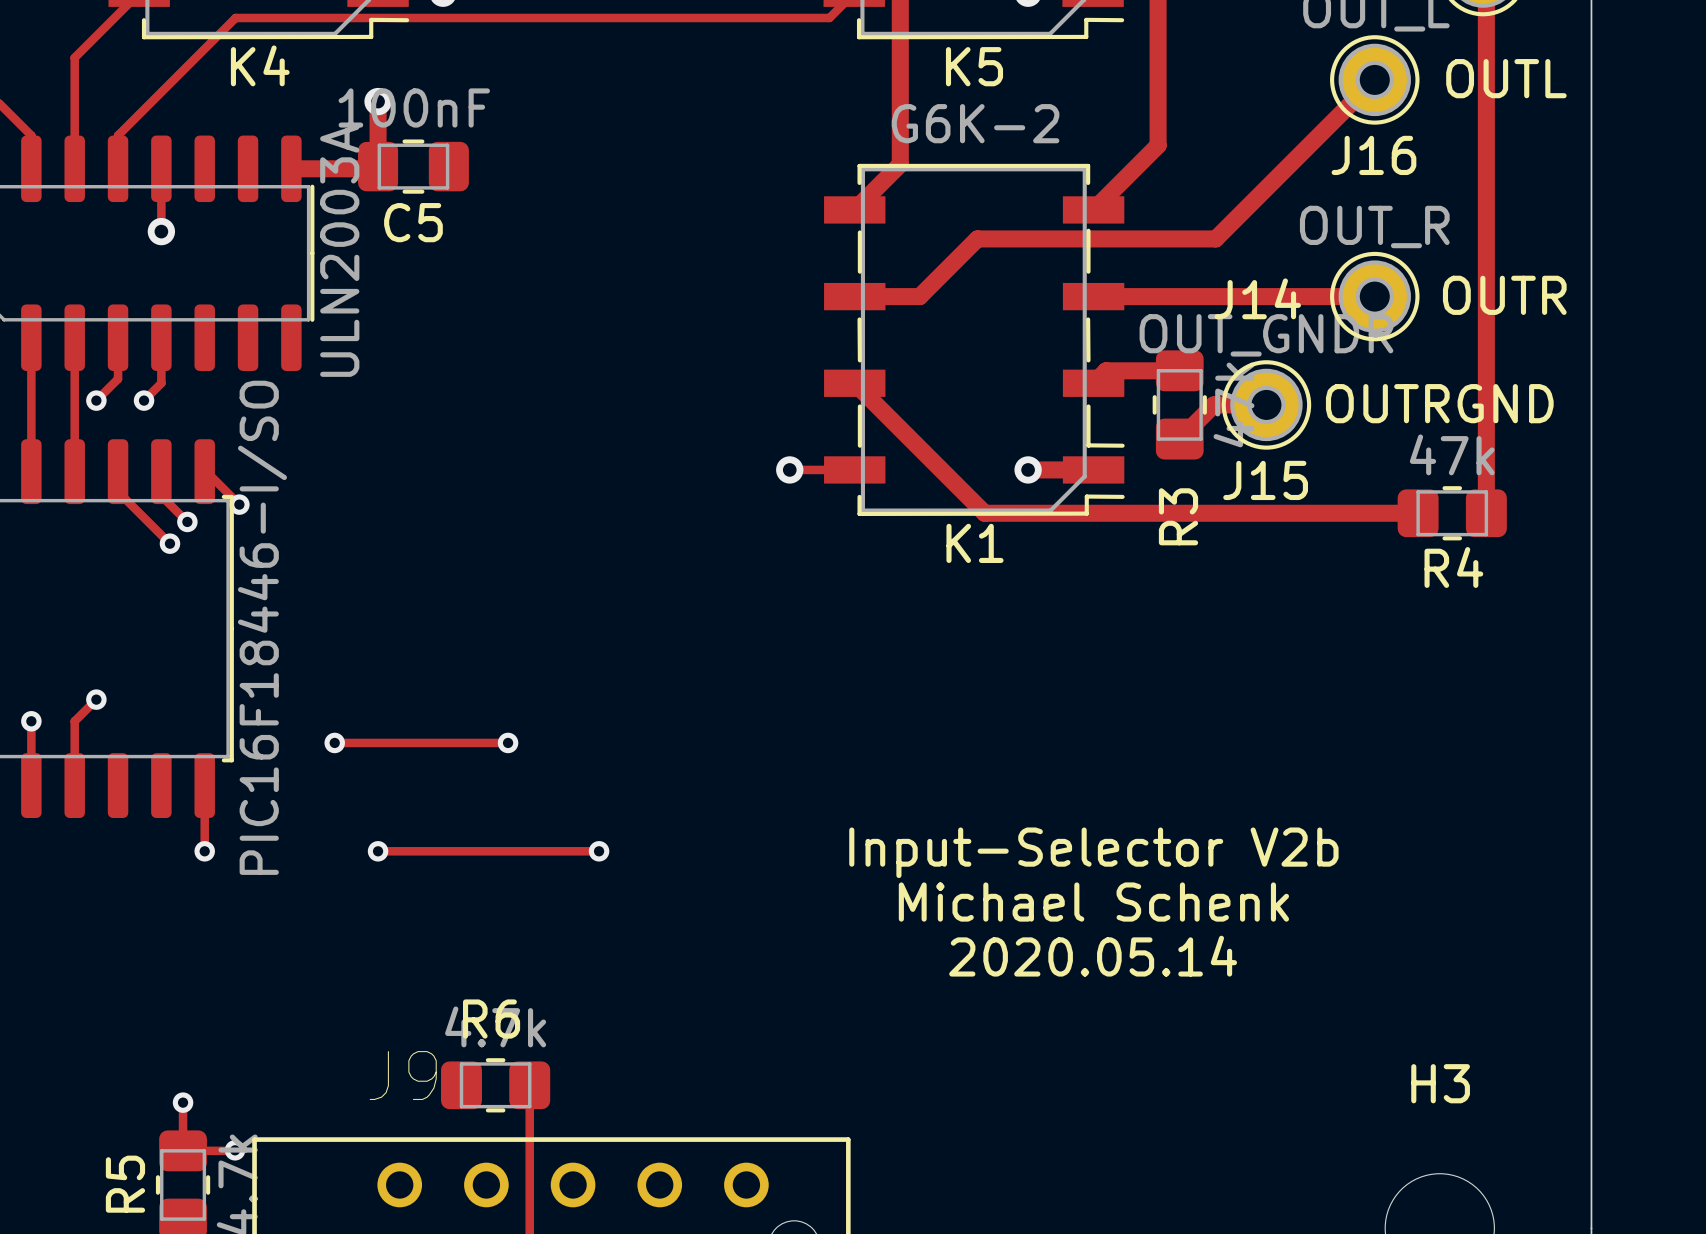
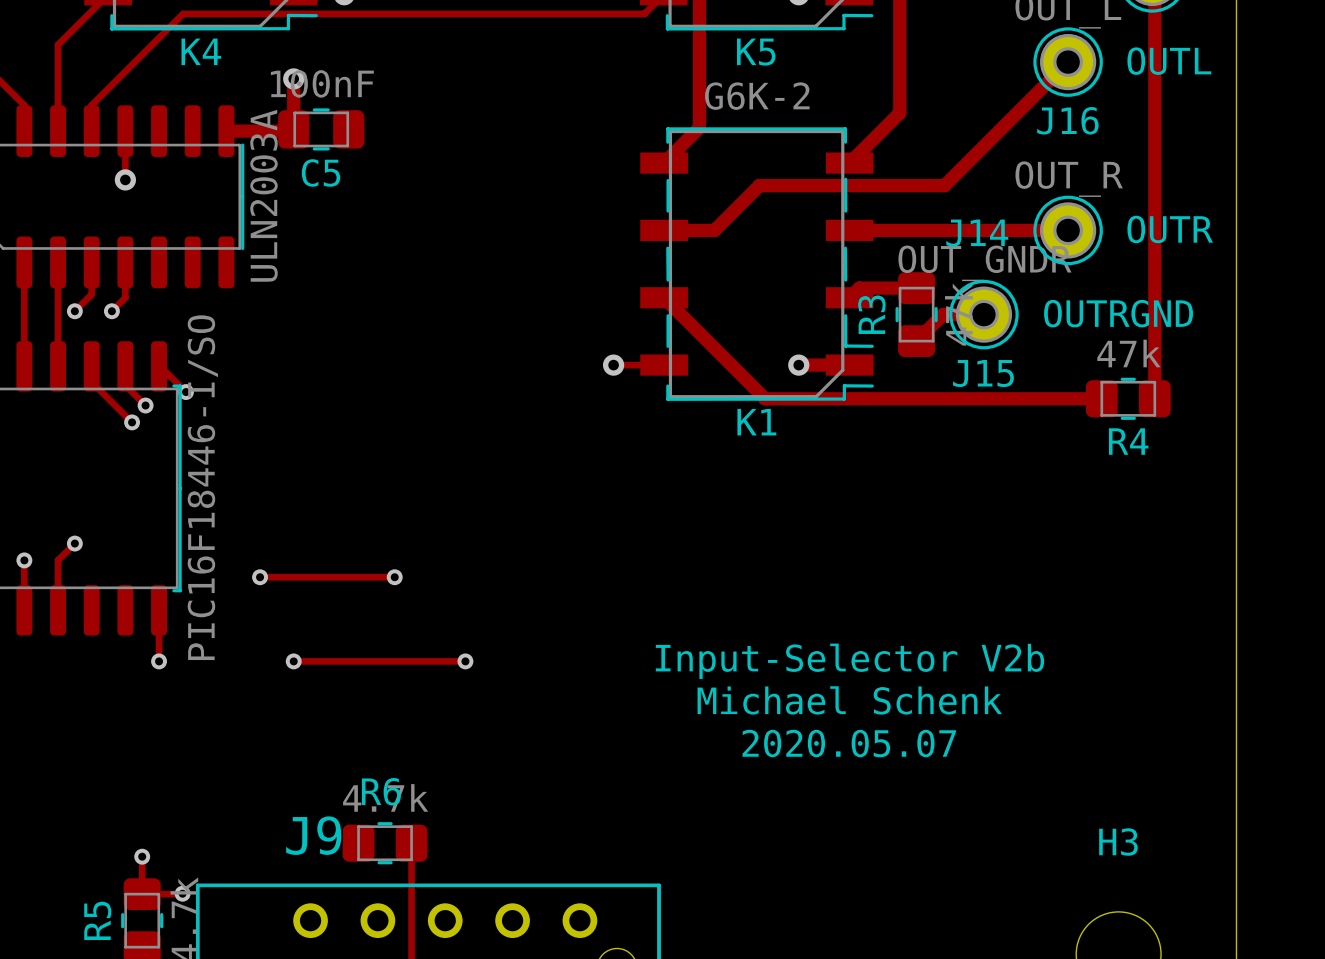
R3 name position: R3 (1178, 516) -> R3 (871, 314)
text: 2020.05.14 (1093, 956) -> 2020.05.07 (849, 743)

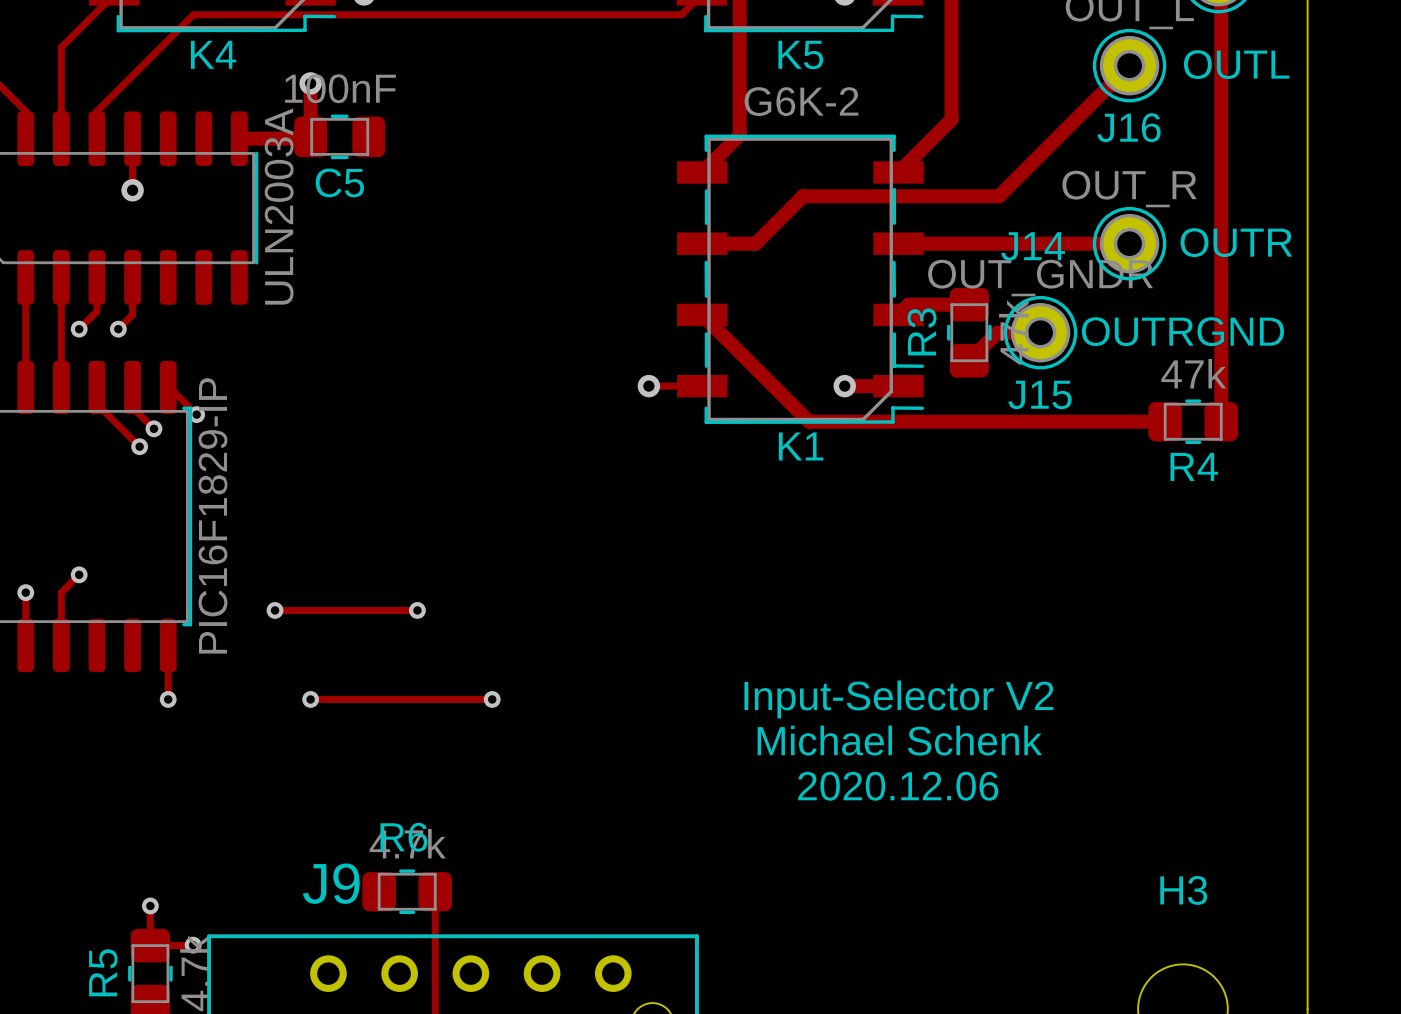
part value: PIC16F18446-I/SO (202, 487) -> PIC16F1829-IP (212, 515)
text: Input-Selector V2b (849, 661) -> Input-Selector V2 (898, 699)
text: 2020.05.07 (849, 743) -> 2020.12.06 (898, 786)

